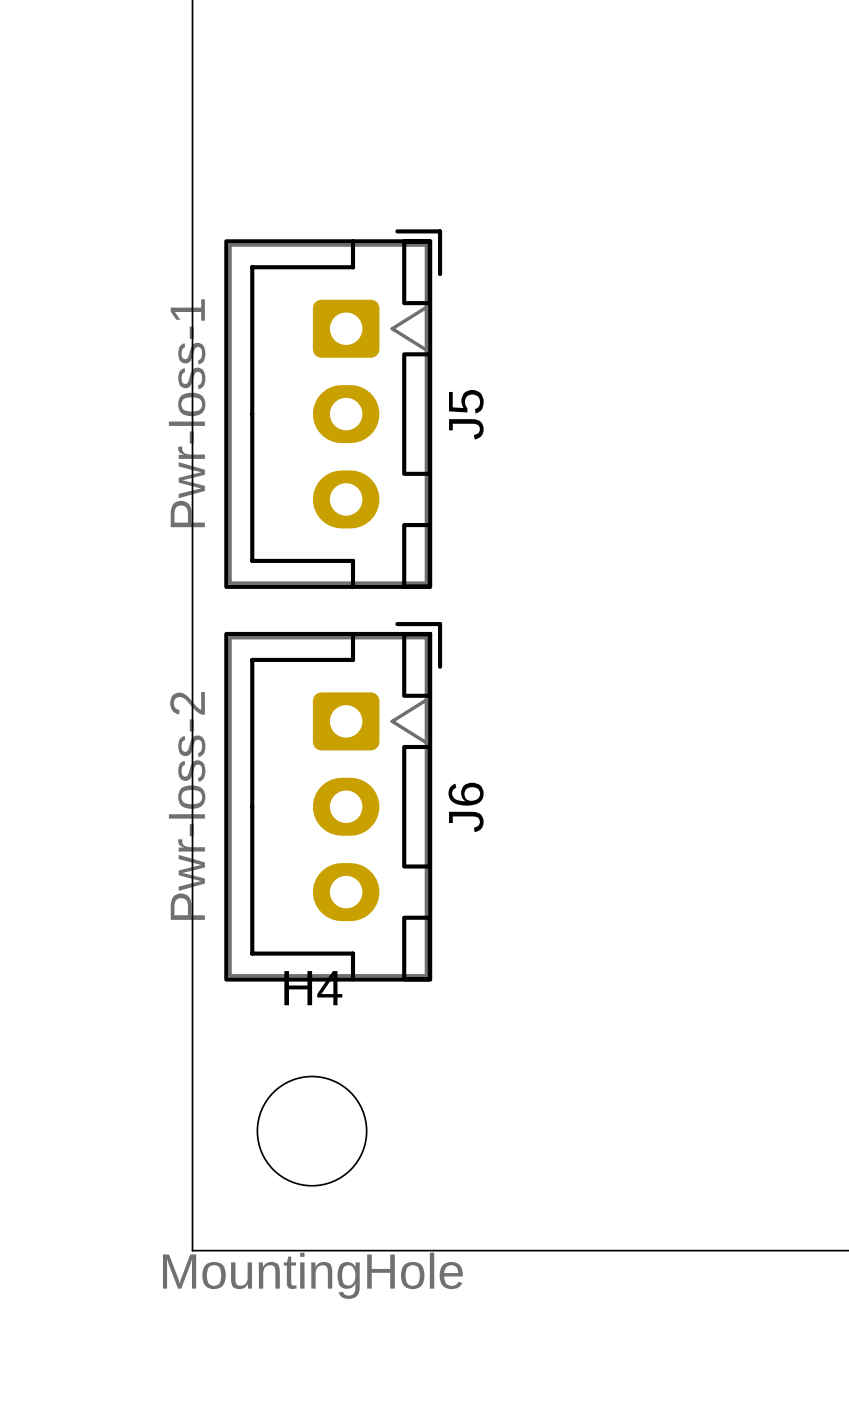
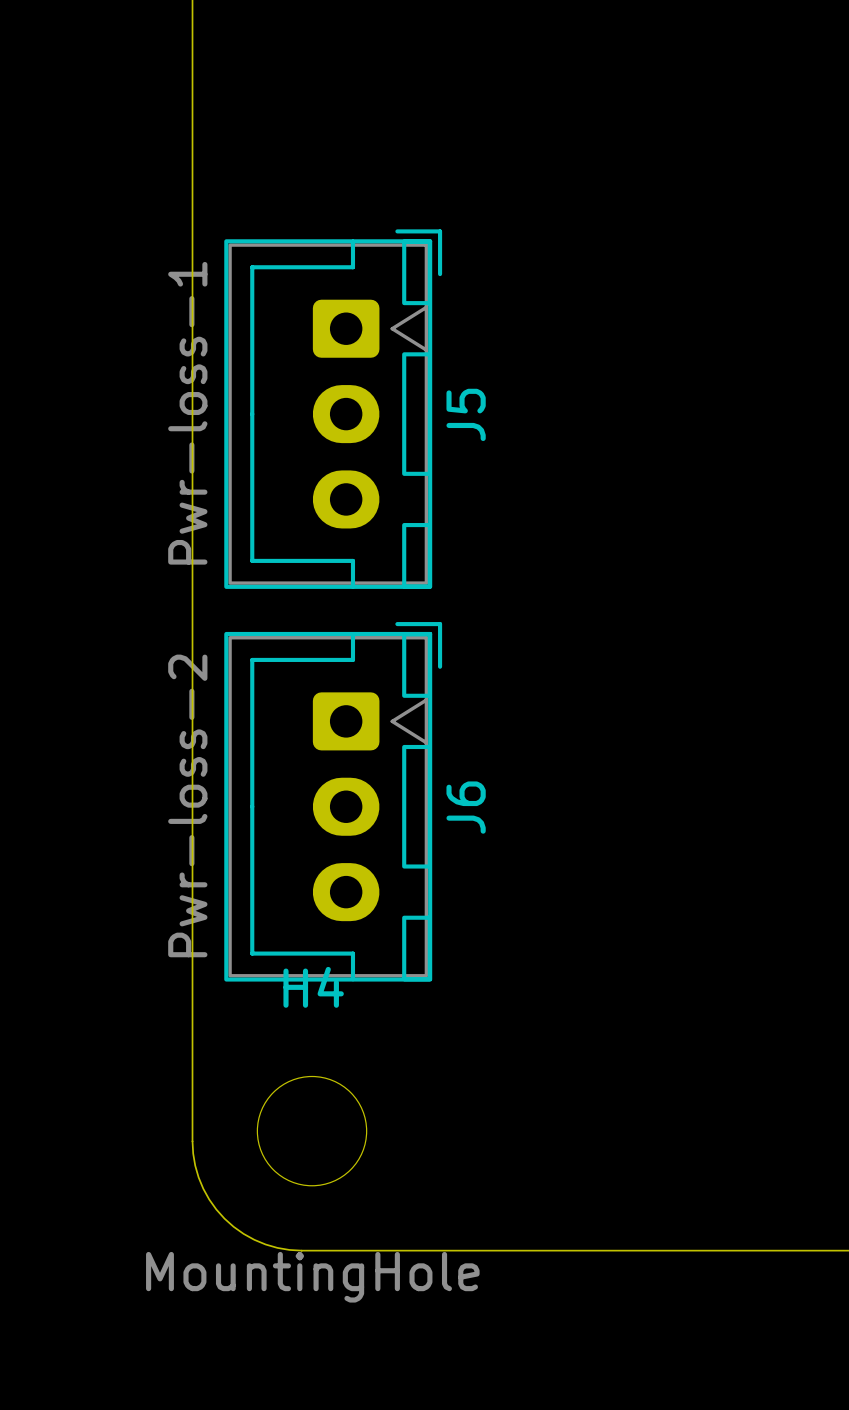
board edge: (192, 1141) (192, 1250) (301, 1250) -> (192, 1141) (195, 1165) (203, 1188) (224, 1218) (254, 1239) (277, 1247) (301, 1250)

